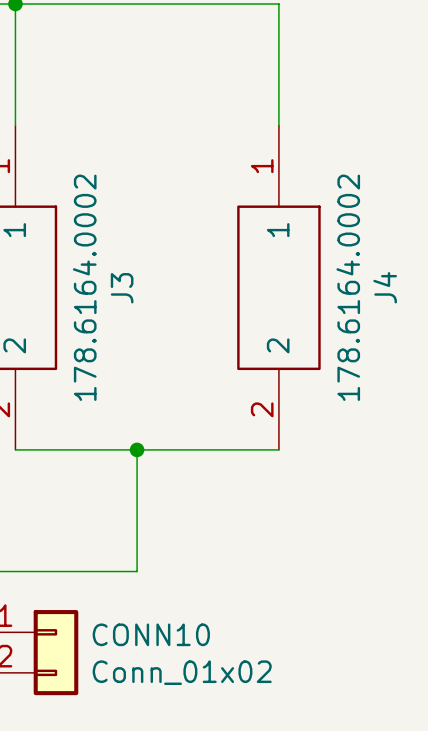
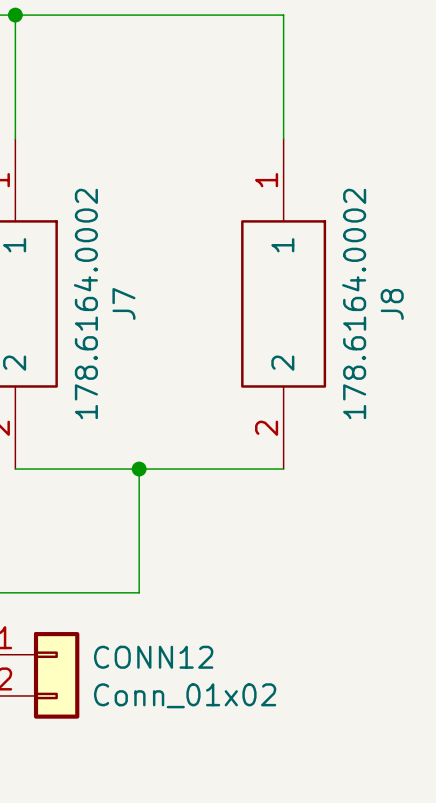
J4 name: J4 (385, 287) -> J8 (392, 304)
J3 name: J3 (122, 288) -> J7 (123, 303)
CONN10 name: CONN10 (151, 634) -> CONN12 (153, 657)

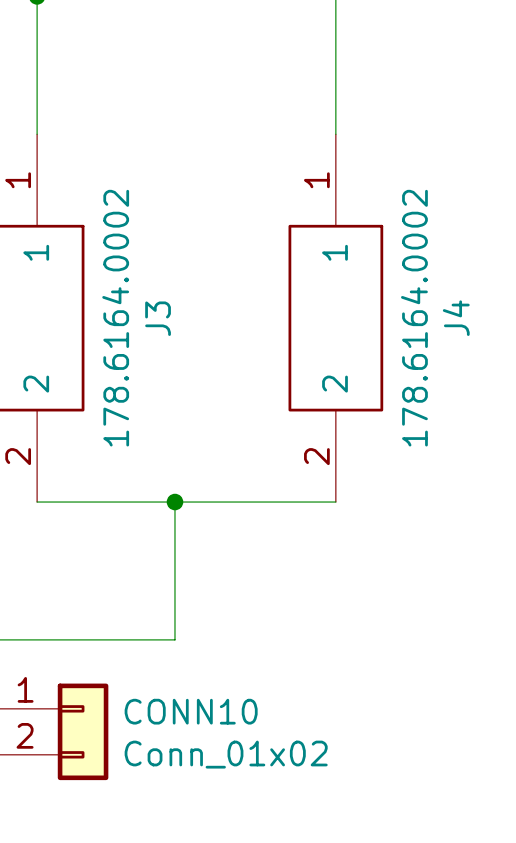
J7 name: J7 (123, 303) -> J3 (158, 318)
J8 name: J8 (392, 304) -> J4 (456, 318)
CONN12 name: CONN12 (153, 657) -> CONN10 (191, 711)

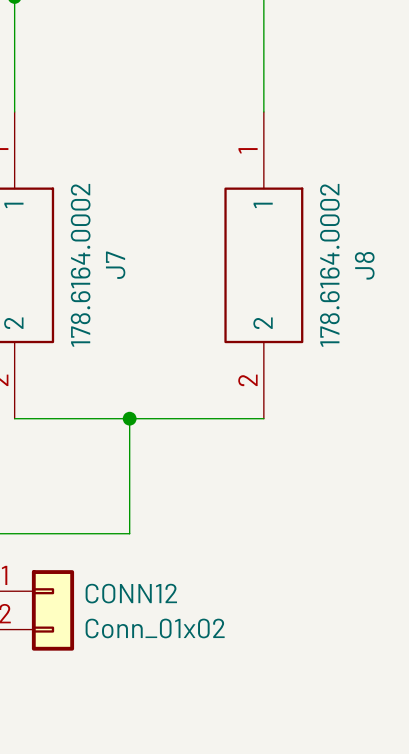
J3 name: J3 (158, 318) -> J7 (115, 265)
J4 name: J4 (456, 318) -> J8 (364, 265)
CONN10 name: CONN10 (191, 711) -> CONN12 (131, 593)

